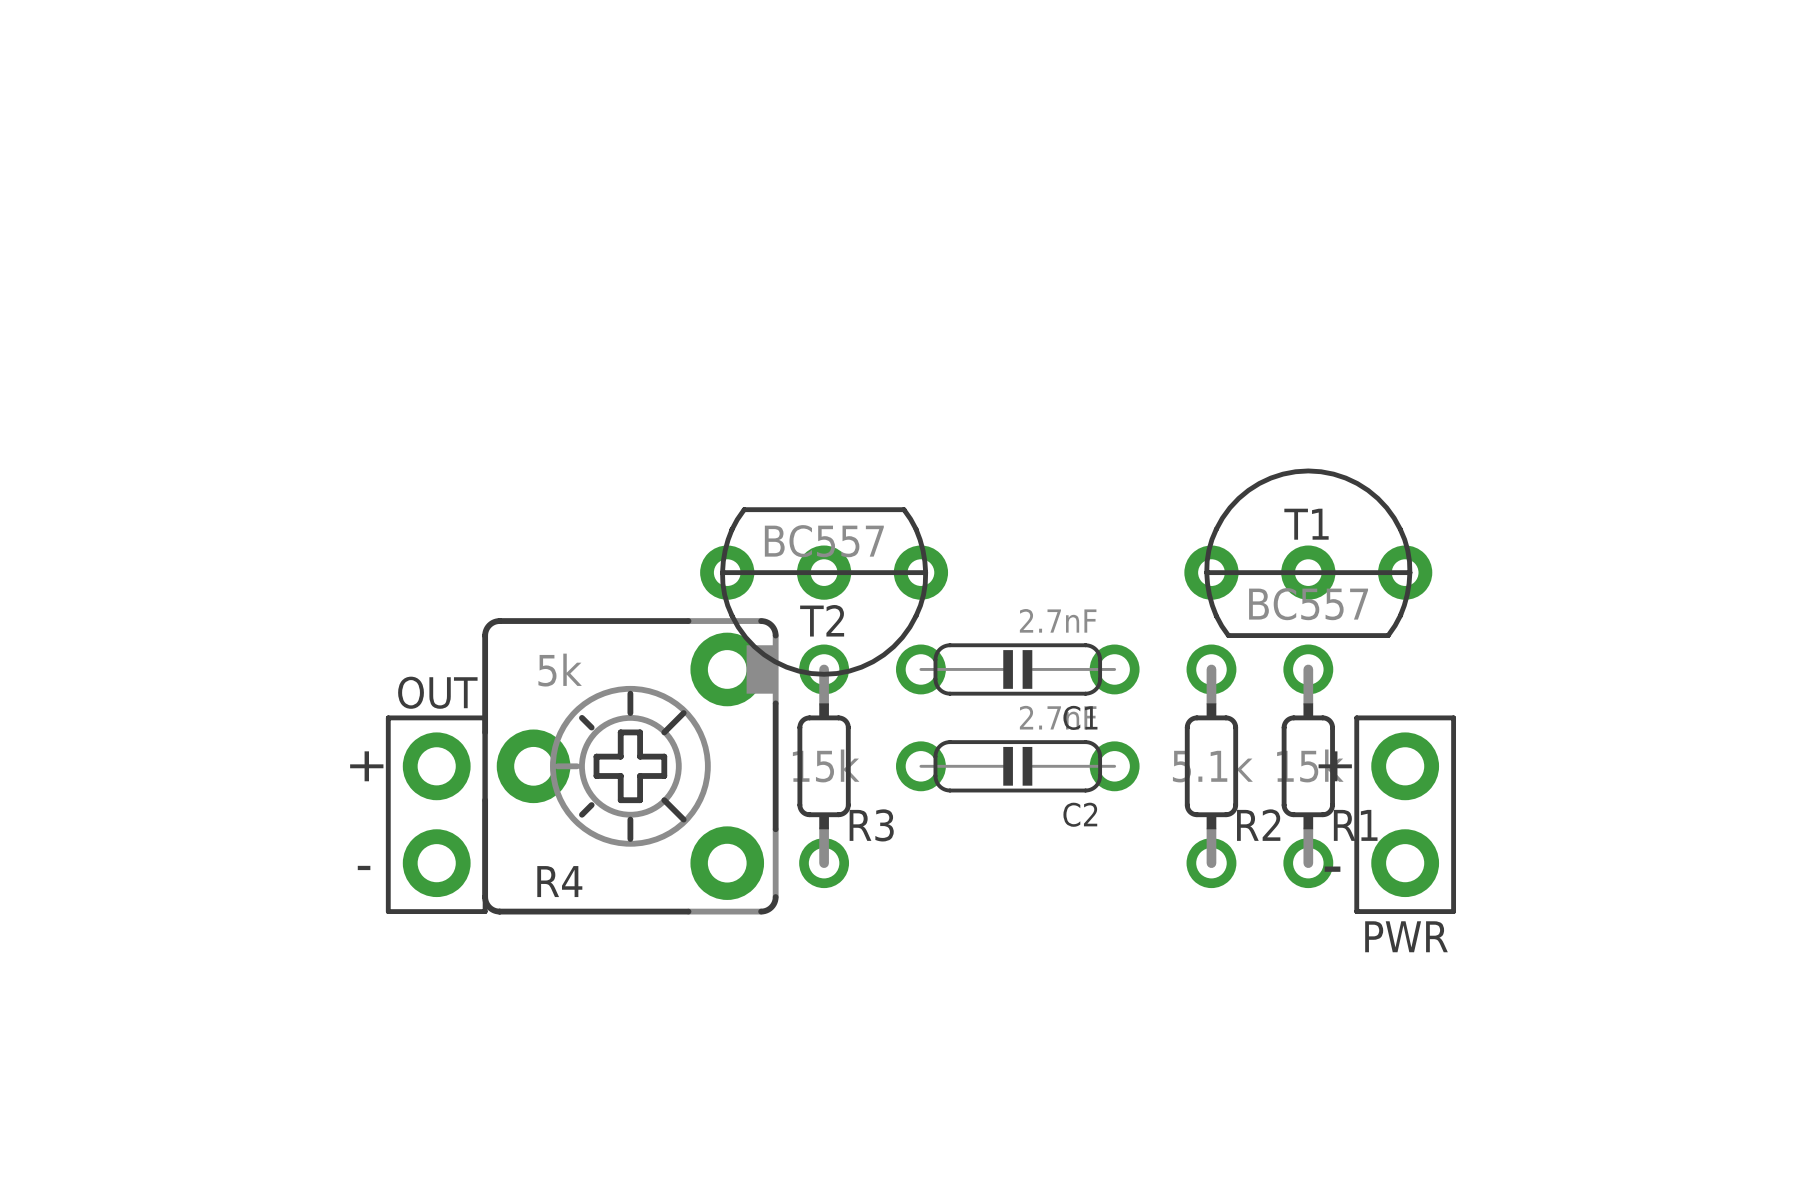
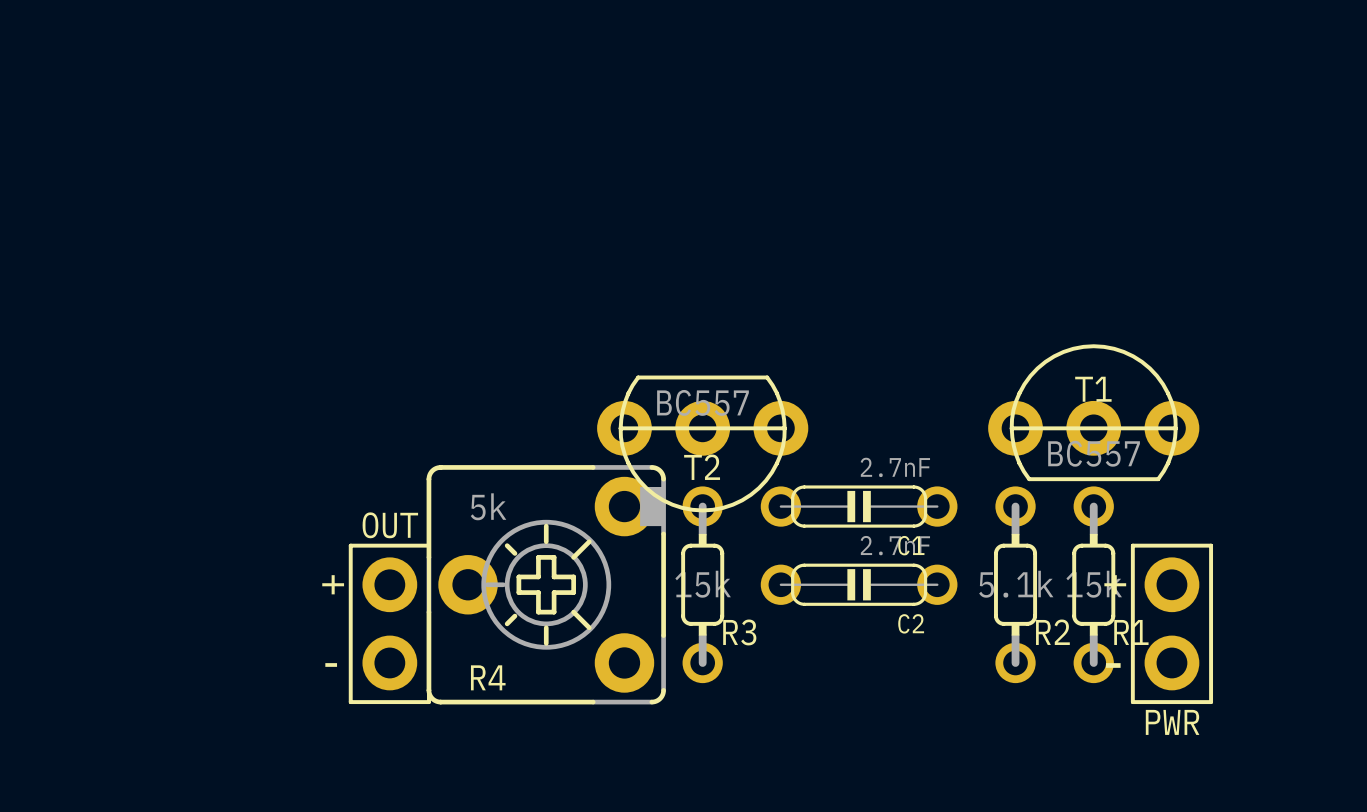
T1 footprint: [1184, 468, 1433, 638] -> [988, 344, 1200, 482]
T2 footprint: [700, 507, 949, 677] -> [597, 375, 809, 513]

